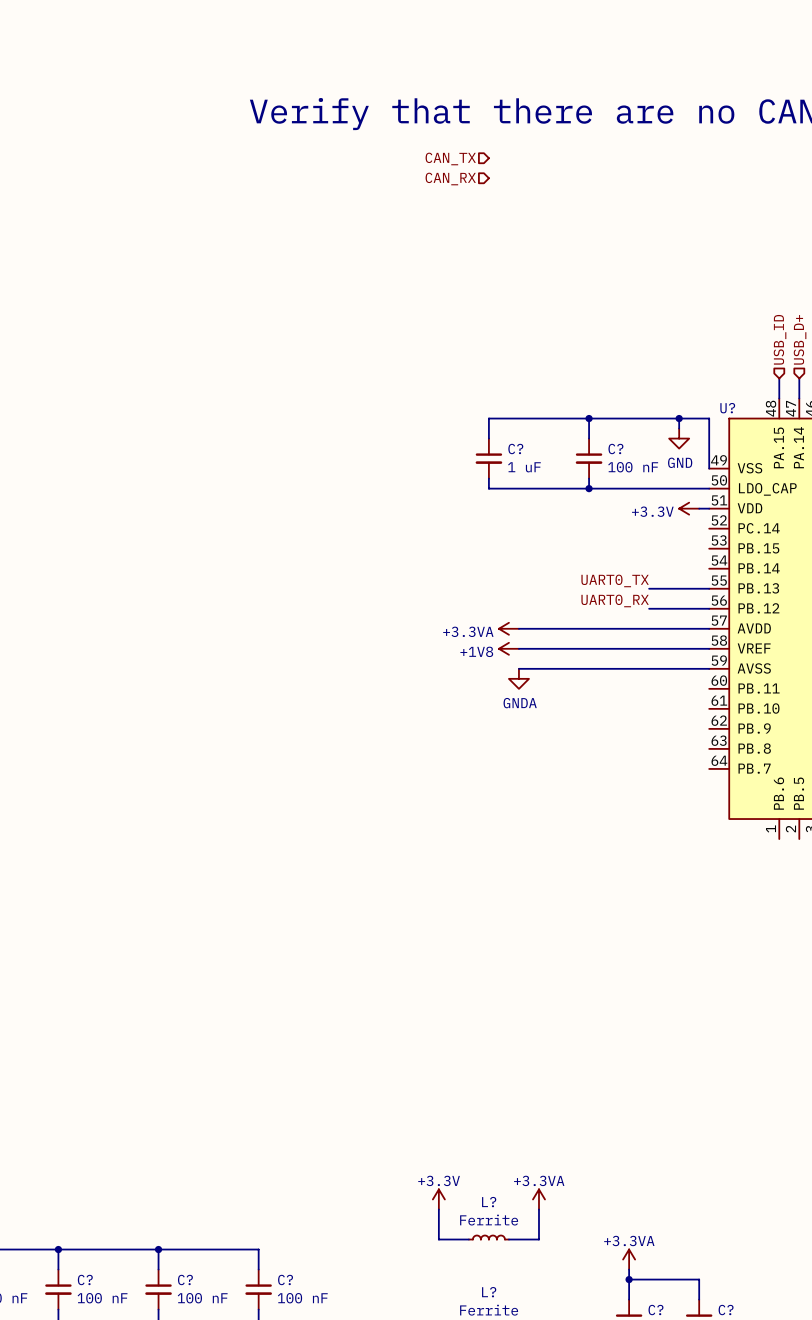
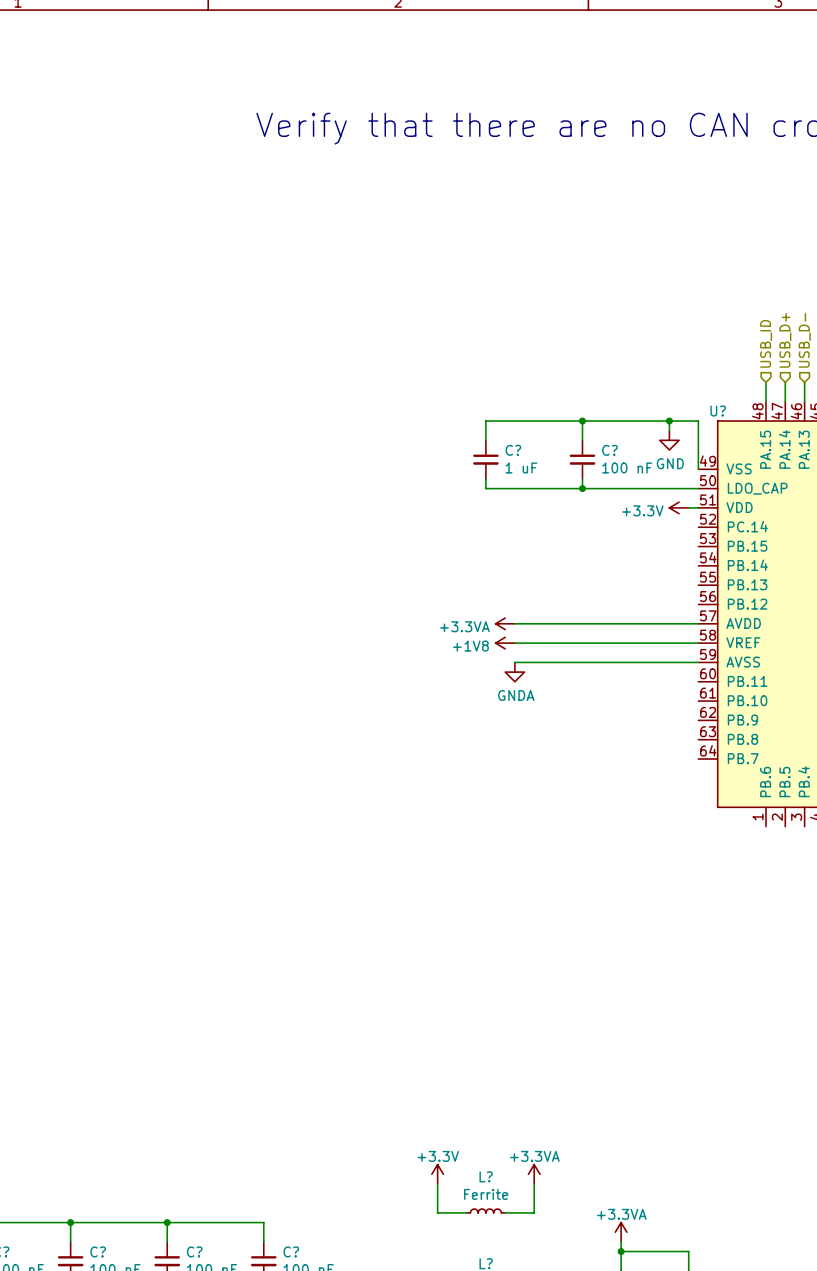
hierarchical label: CAN_TX (450, 158) -> none
hierarchical label: CAN_RX (450, 179) -> none
label: UART0_TX (615, 580) -> none
wire: (649, 588) (709, 588) -> none
label: UART0_RX (615, 600) -> none
wire: (649, 608) (709, 608) -> none

